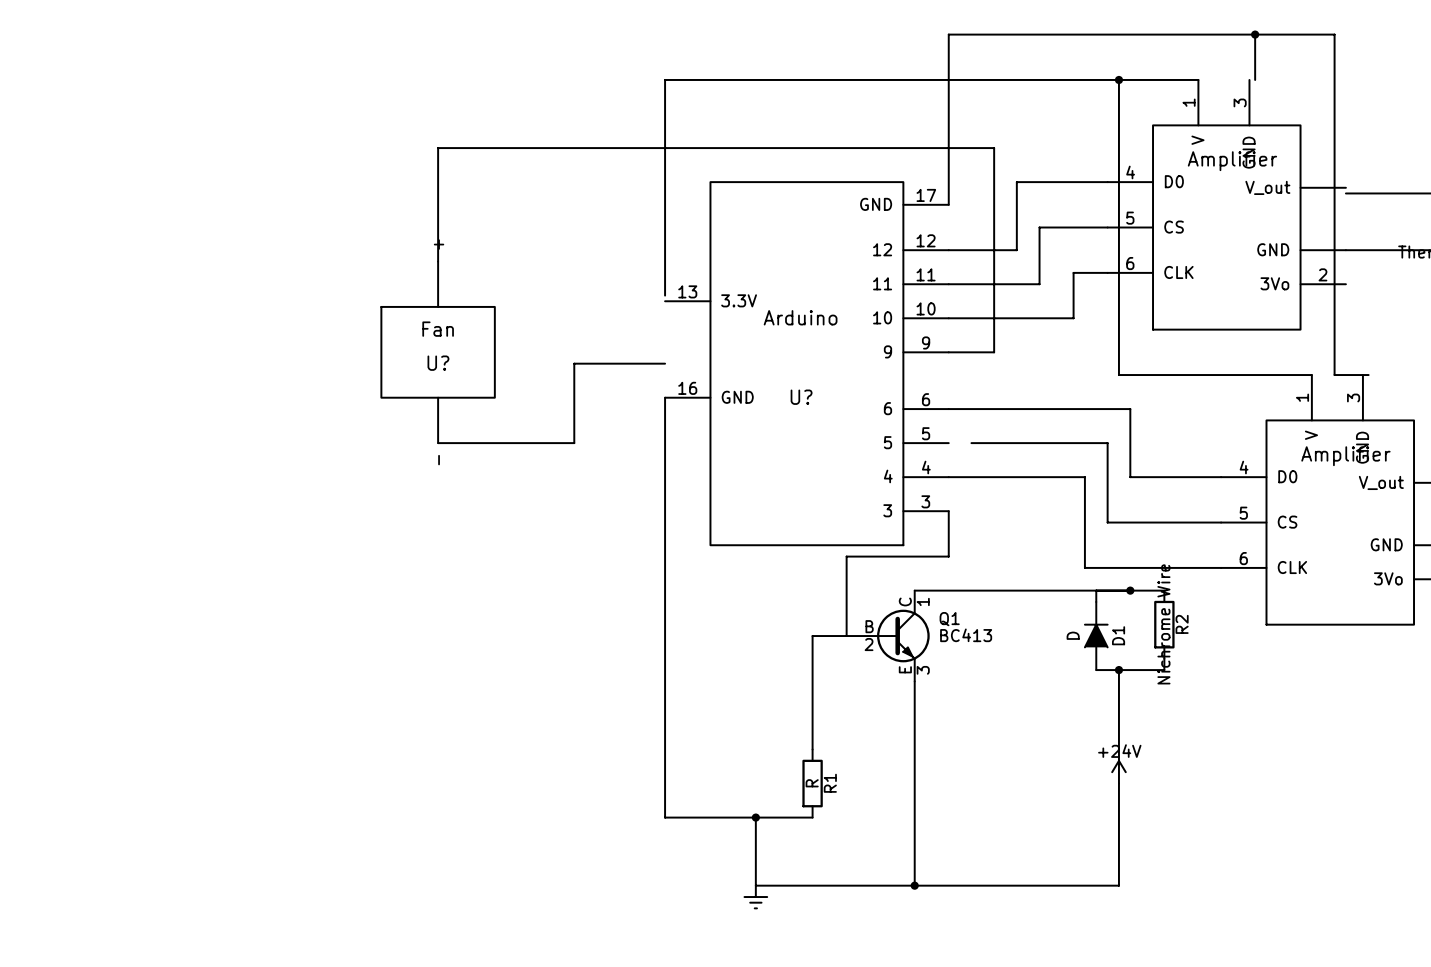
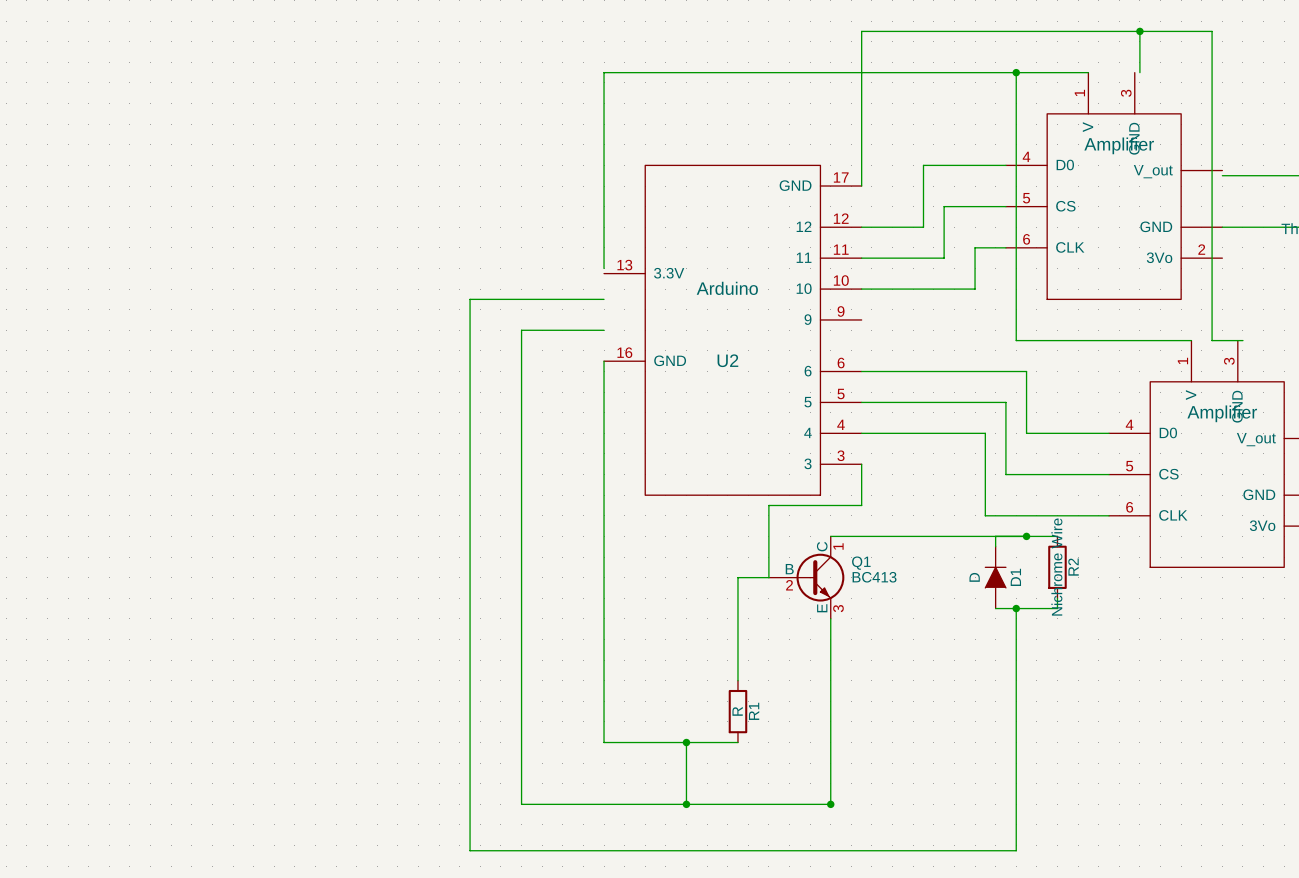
wire: (438, 261) (438, 148) (994, 148) (994, 352) (948, 352) -> none
U?: Fan (438, 352) -> none
U? name: U? (801, 397) -> U2 (727, 360)
wire: (438, 443) (574, 443) -> (686, 804) (521, 804) (521, 402)
wire: none -> (861, 402) (882, 402)
power symbol: +24V (1118, 772) -> none
junction: none -> (686, 804)
wire: (914, 885) (1118, 885) -> (604, 299) (470, 299) (470, 850) (1016, 850) (1016, 804)
power symbol: (755, 897) -> none

